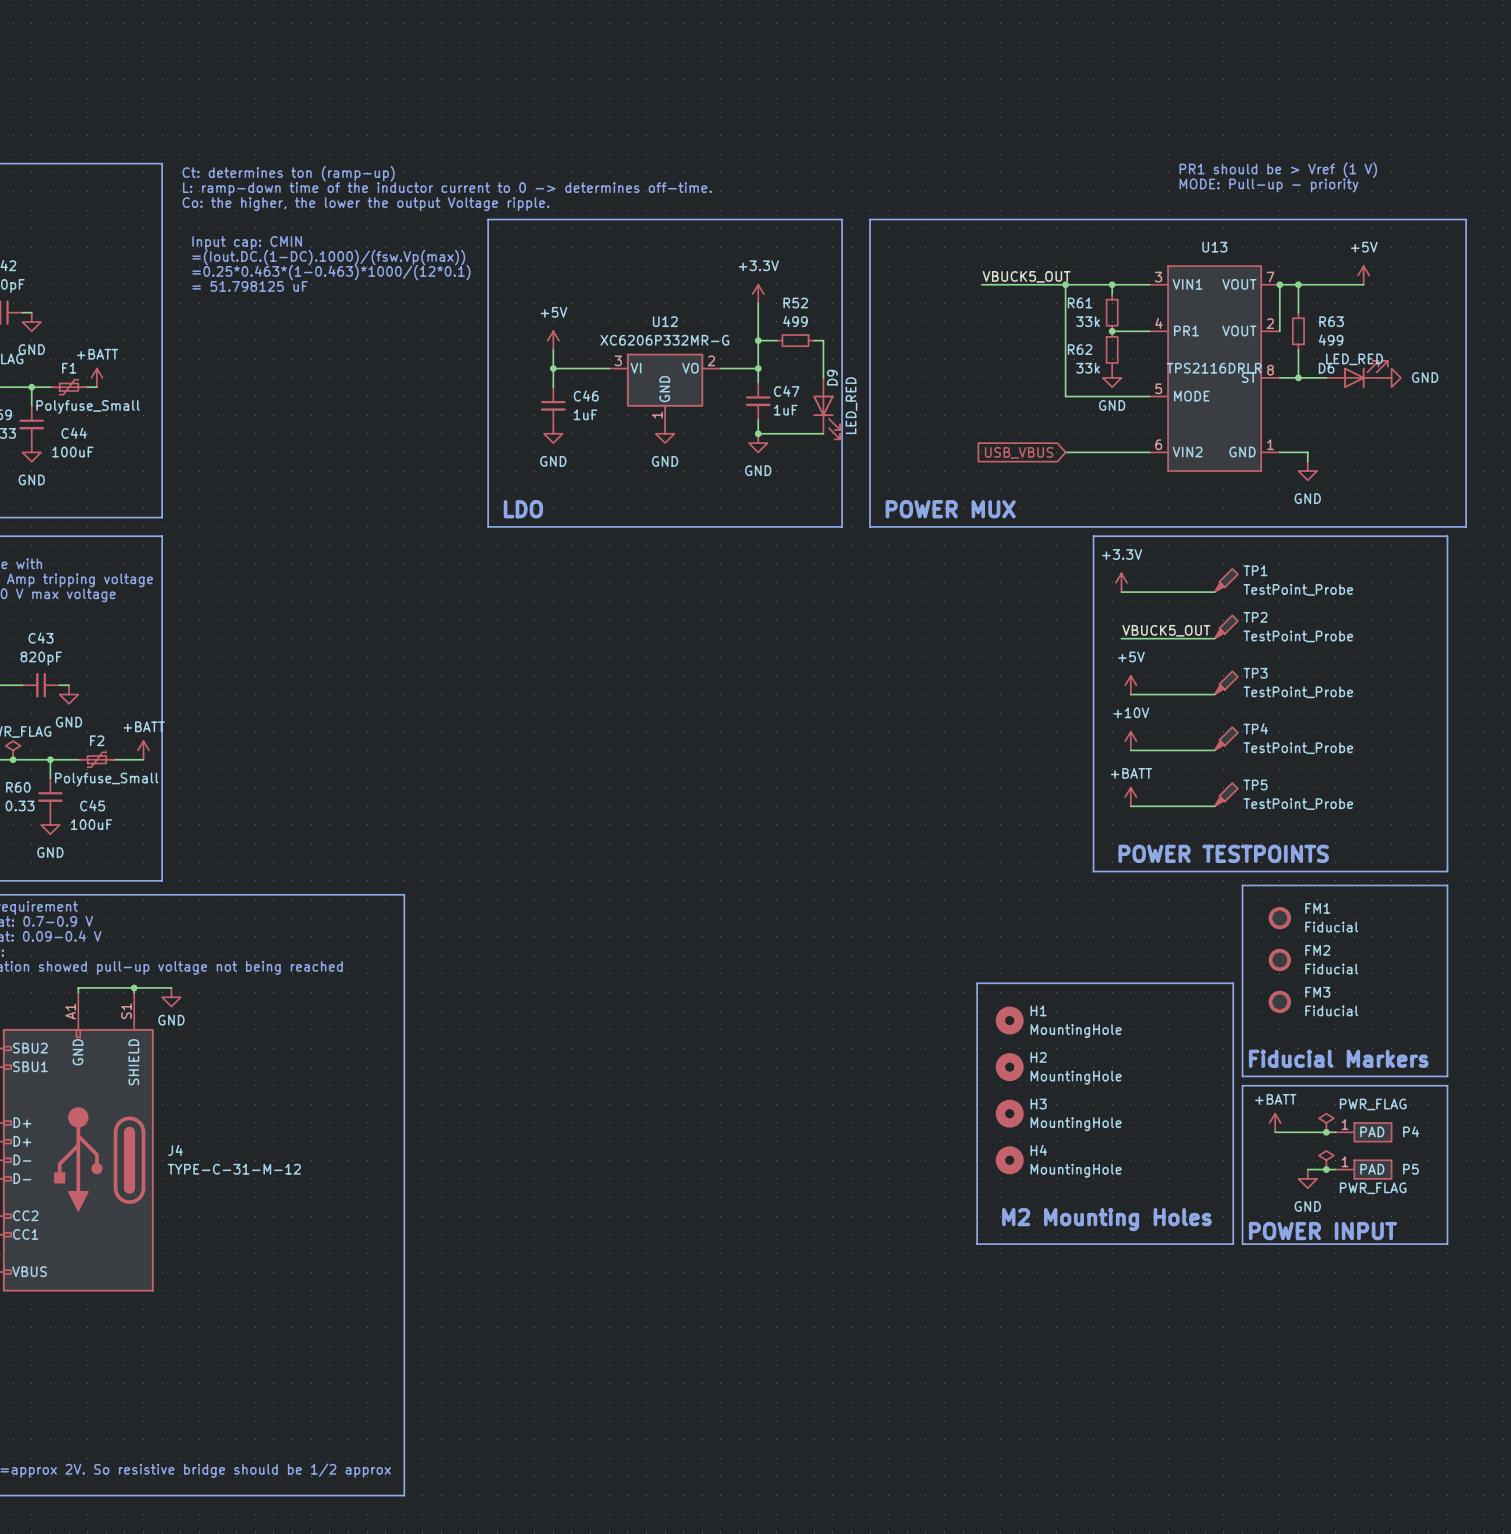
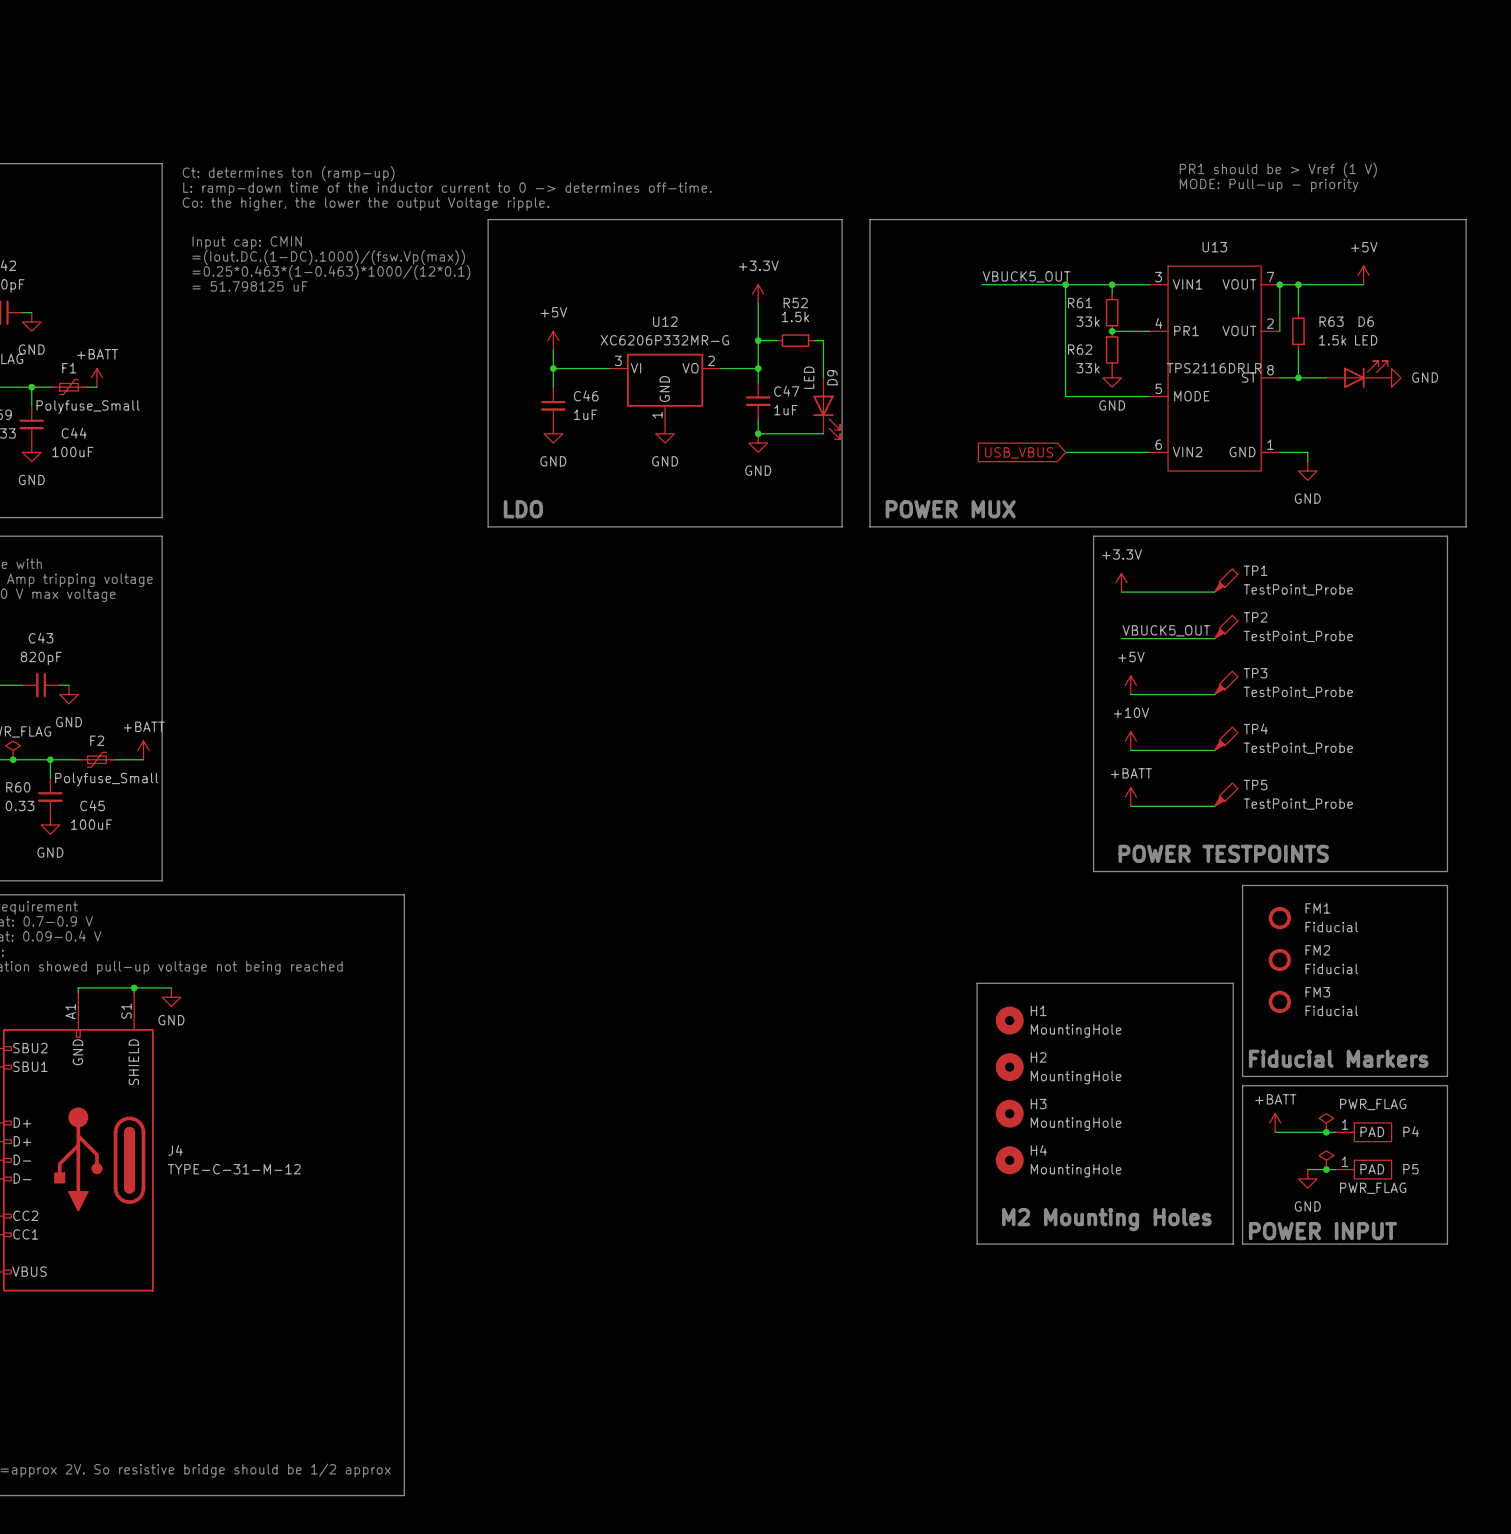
R52 value: 499 (795, 321) -> 1.5k (795, 316)
R63 value: 499 (1331, 340) -> 1.5k (1332, 340)
D6 value: LED_RED (1354, 359) -> LED (1366, 340)
D6 name position: D6 (1326, 368) -> D6 (1366, 321)
D9 value: LED_RED (851, 405) -> LED (809, 377)

